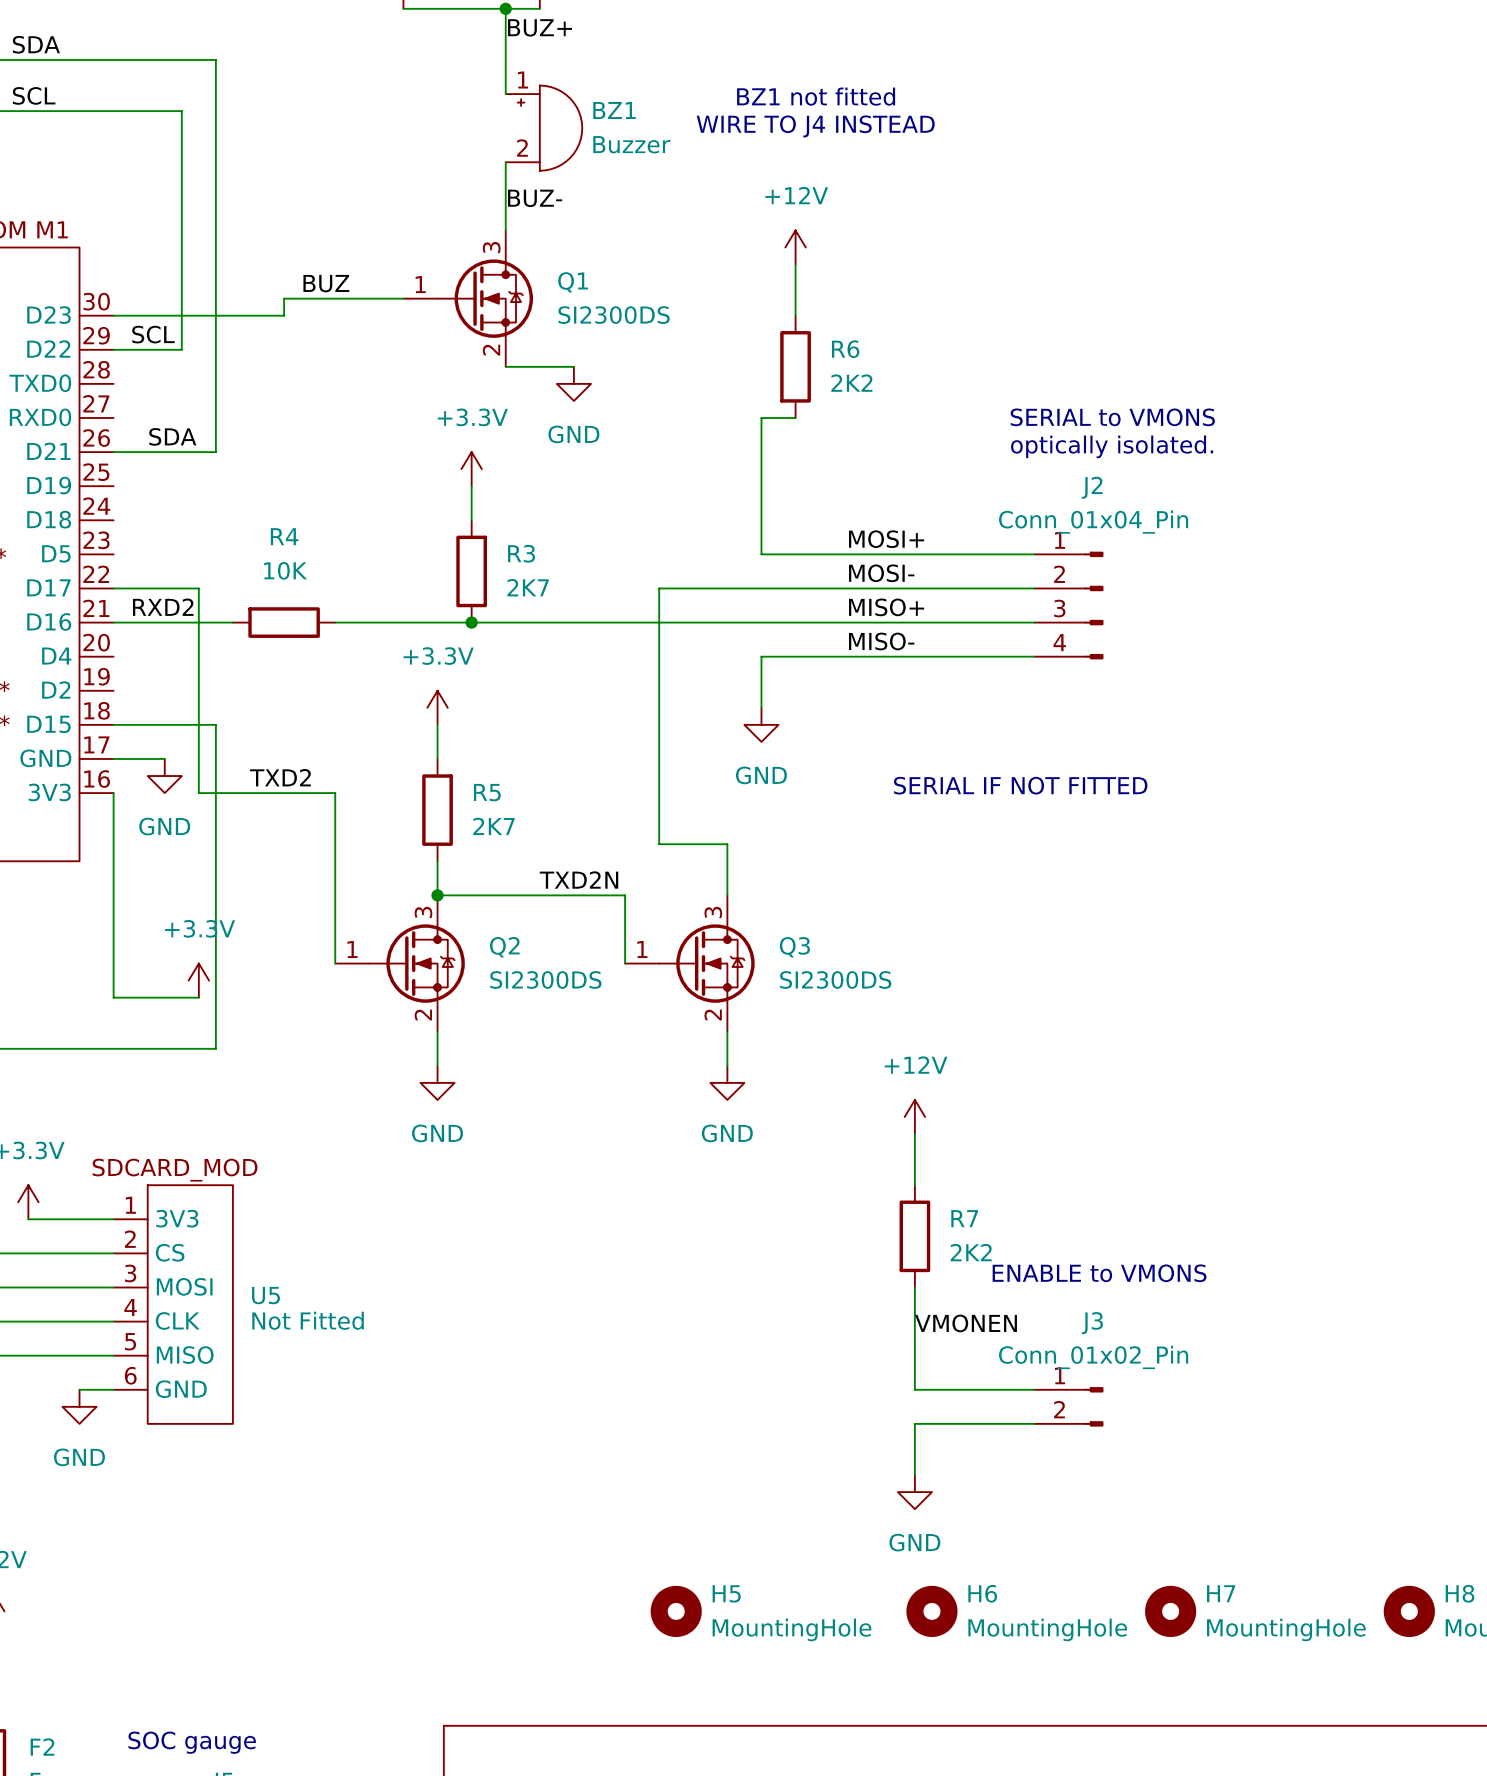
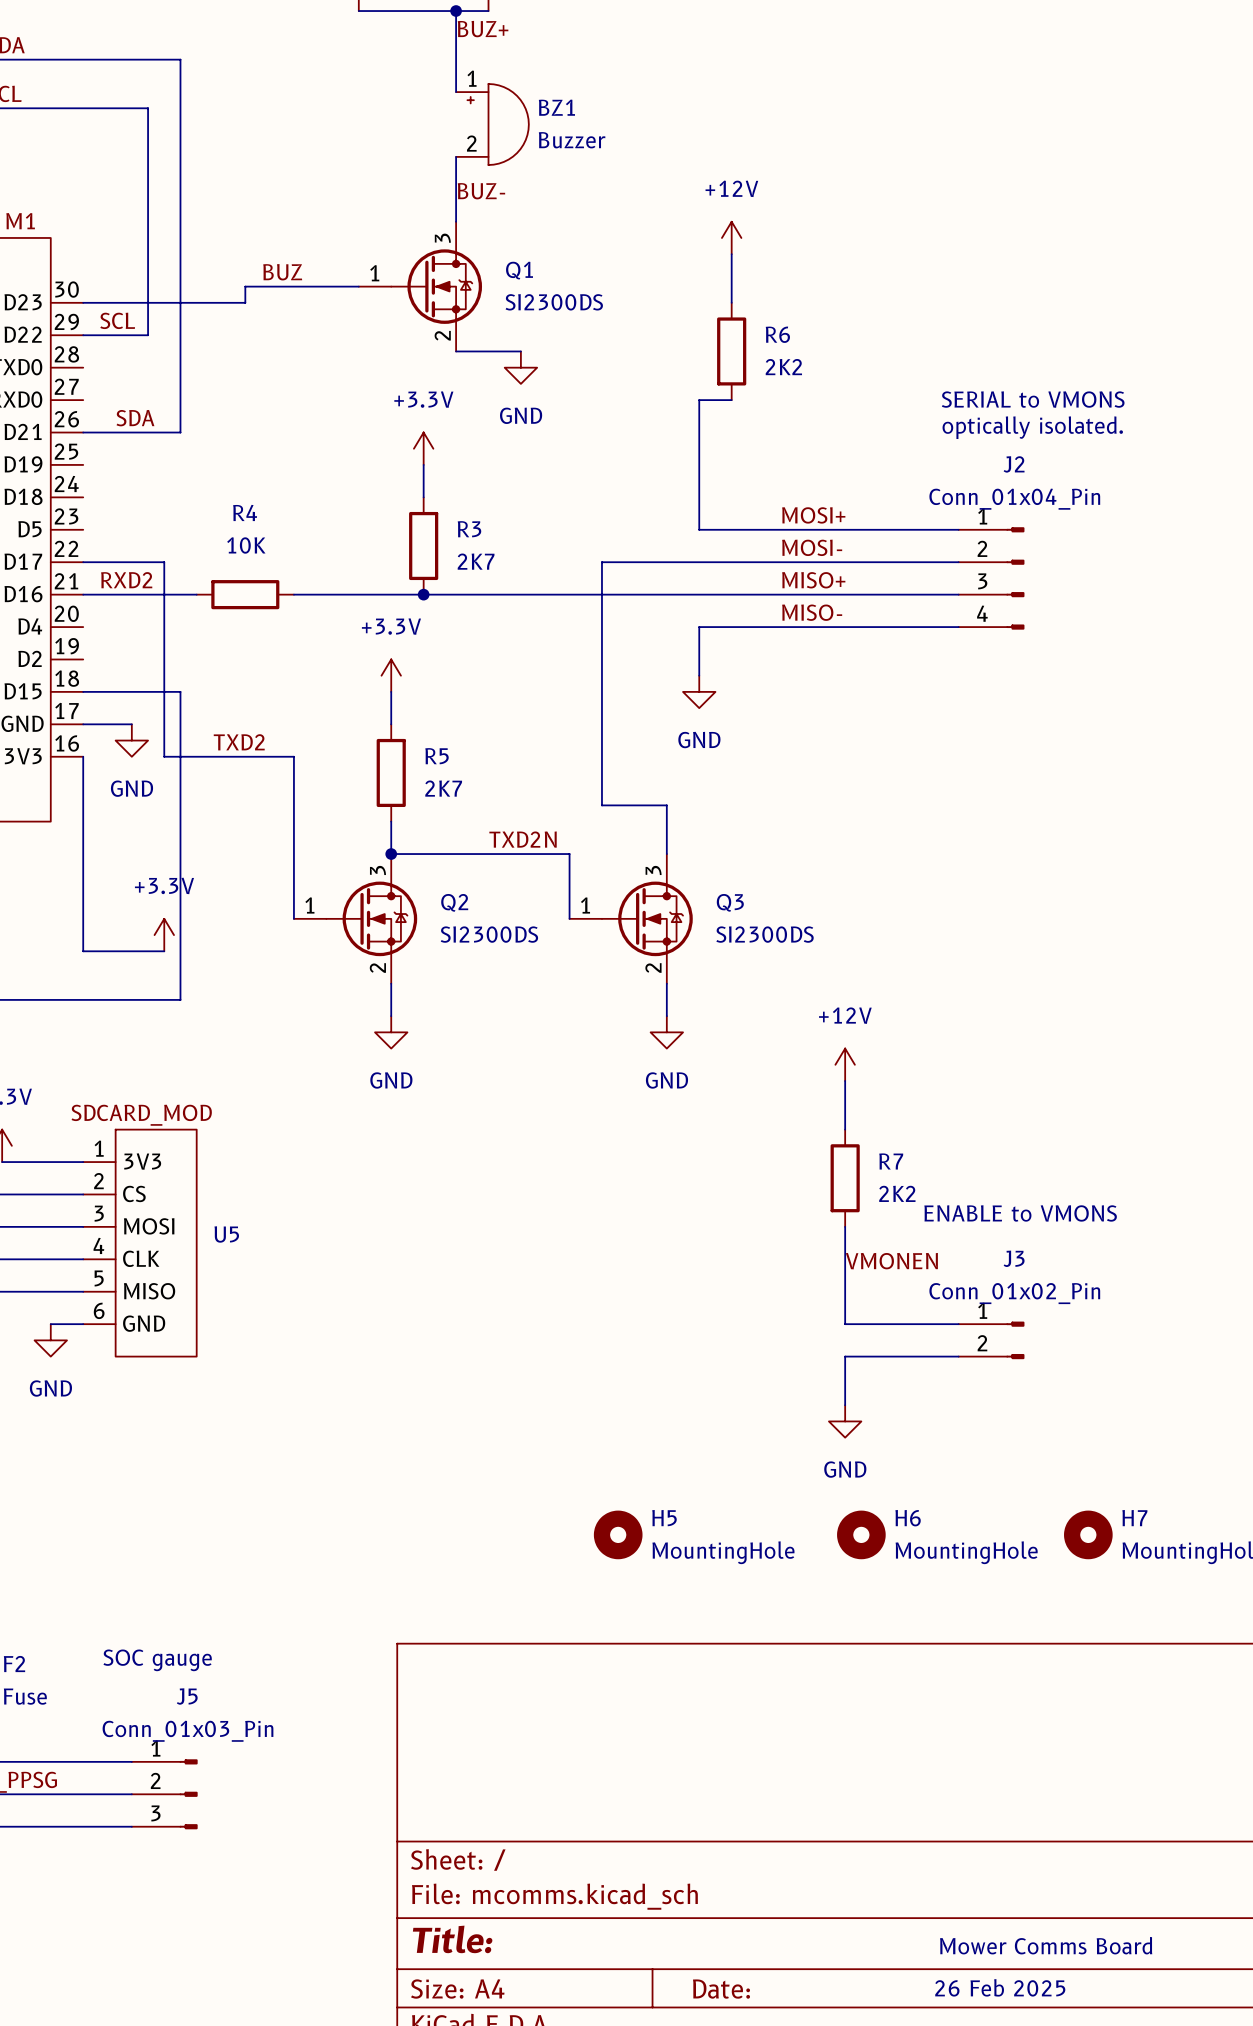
text: BZ1 not fitted (816, 96) -> none
text: WIRE TO J4 INSTEAD (815, 126) -> none
text: SERIAL IF NOT FITTED (1020, 785) -> none
U5 value: Not Fitted (308, 1320) -> none

